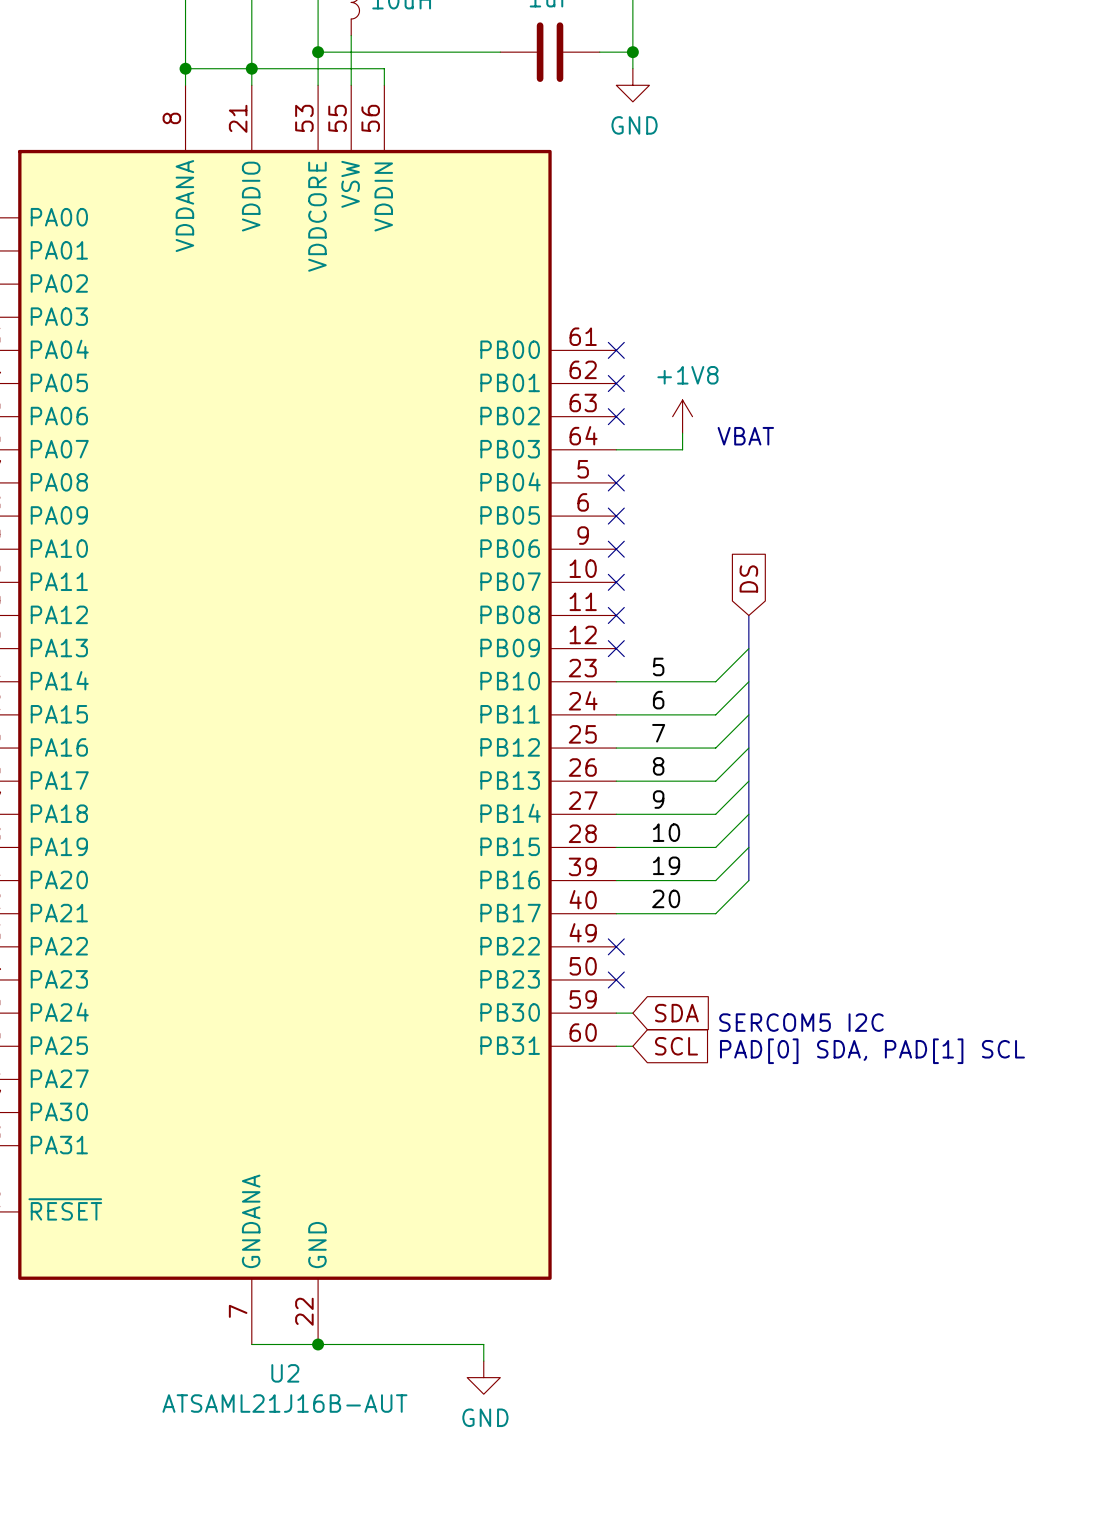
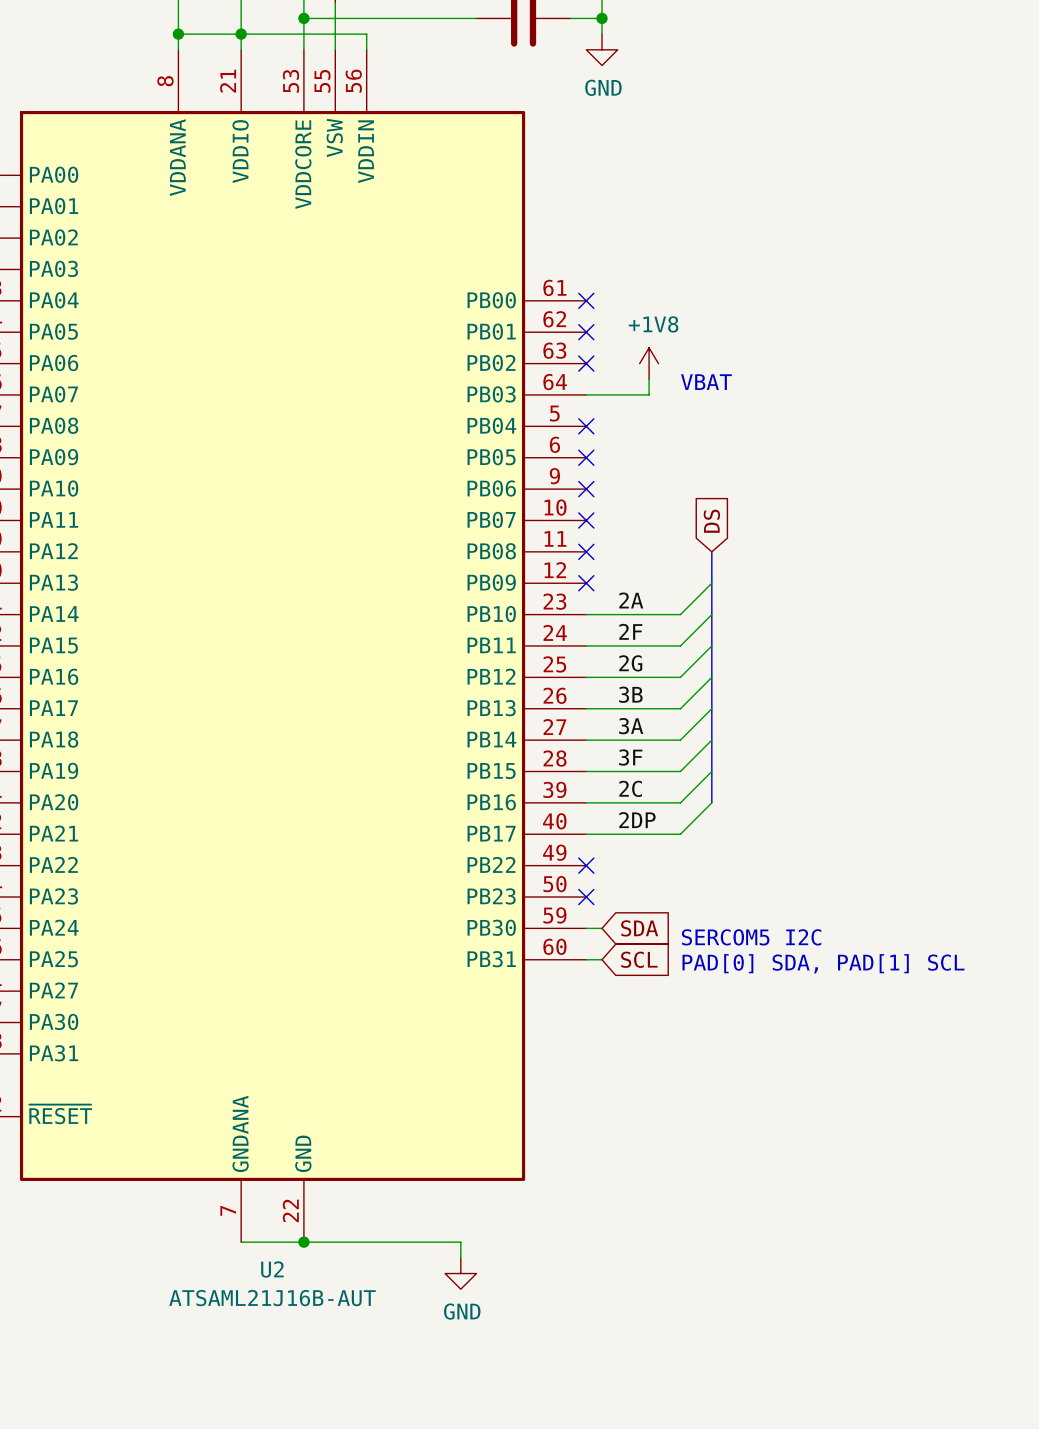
label: 5 (658, 666) -> 2A (631, 600)
label: 6 (658, 700) -> 2F (630, 631)
label: 7 (658, 733) -> 2G (630, 663)
label: 8 (658, 766) -> 3B (630, 694)
label: 9 (658, 799) -> 3A (631, 726)
label: 10 (666, 832) -> 3F (630, 757)
label: 19 (666, 865) -> 2C (630, 788)
label: 20 (666, 898) -> 2DP (637, 820)

